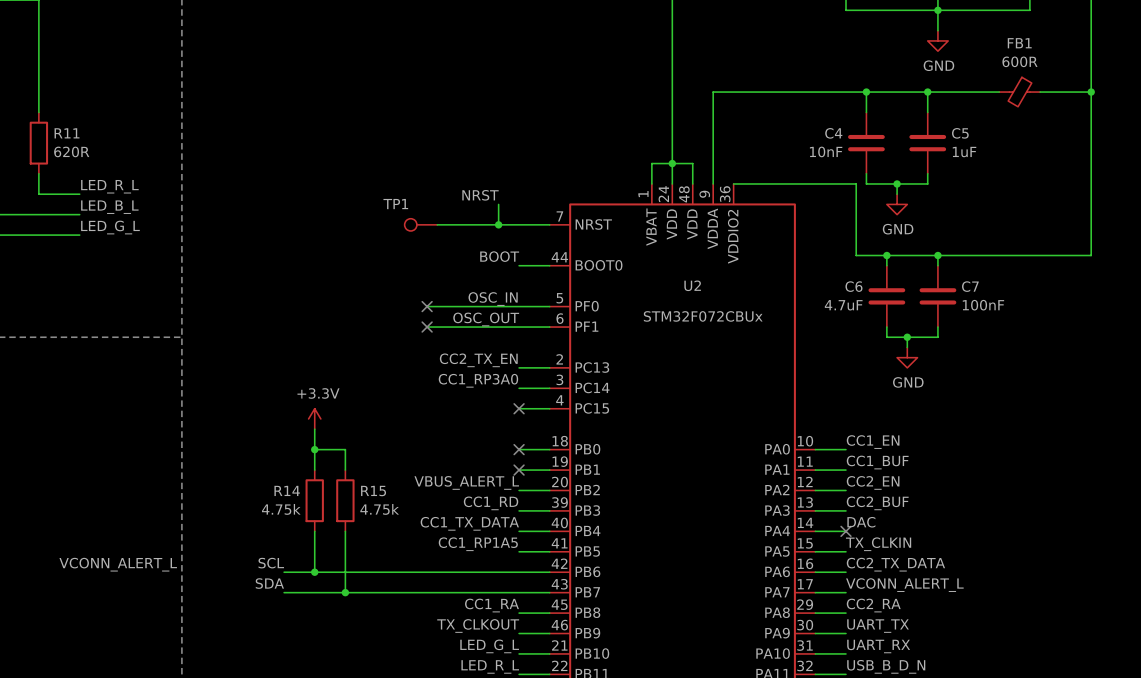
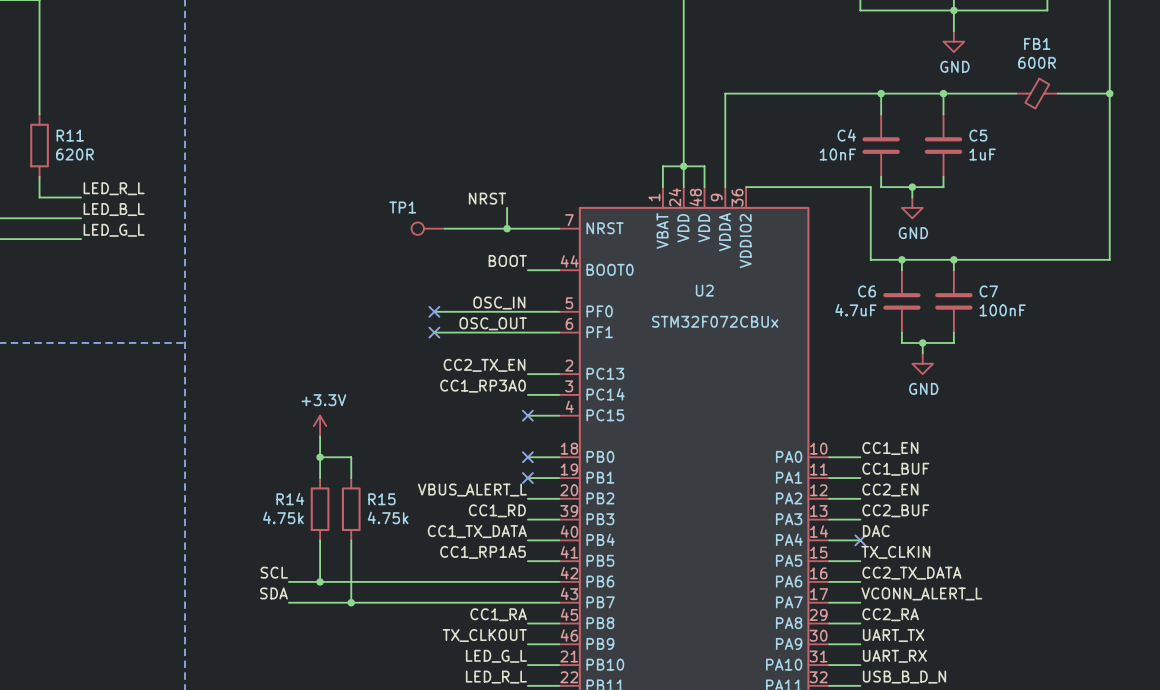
label: VCONN_ALERT_L (118, 564) -> none

